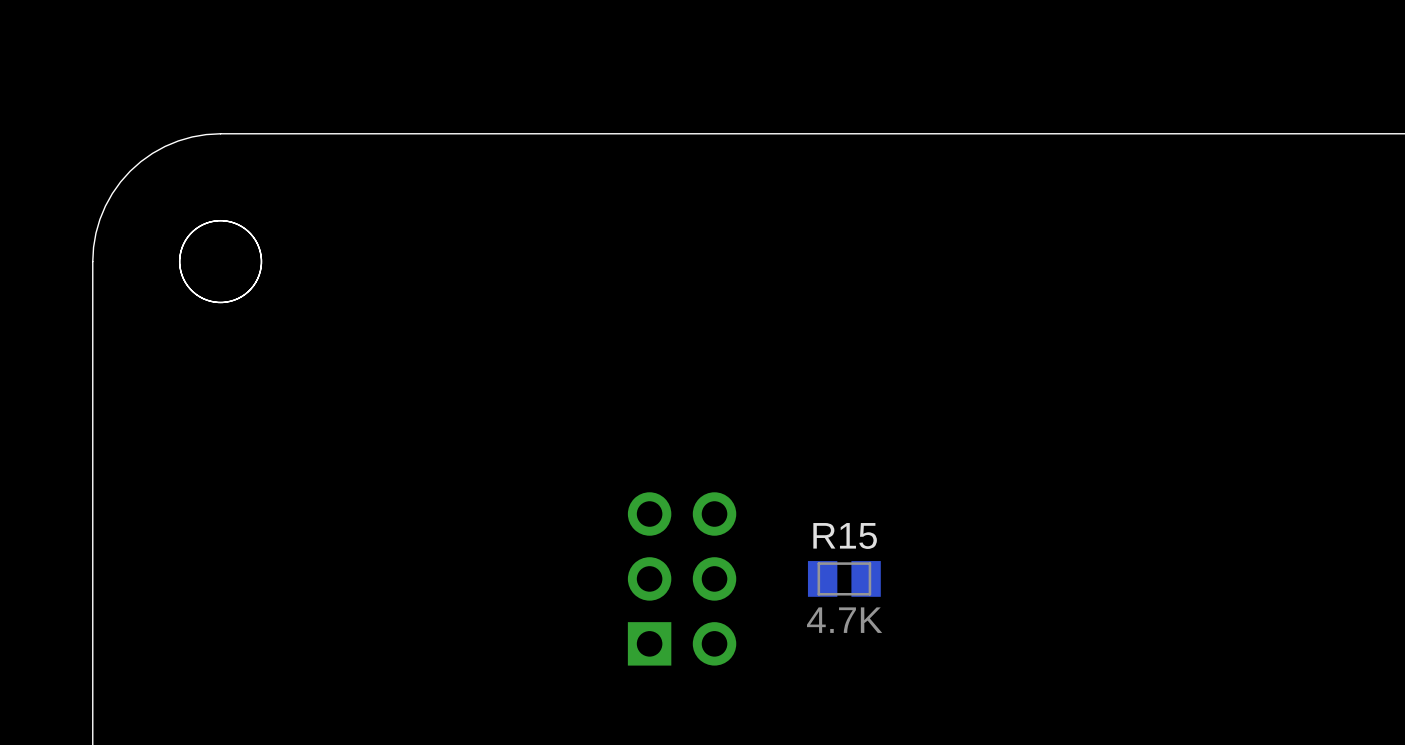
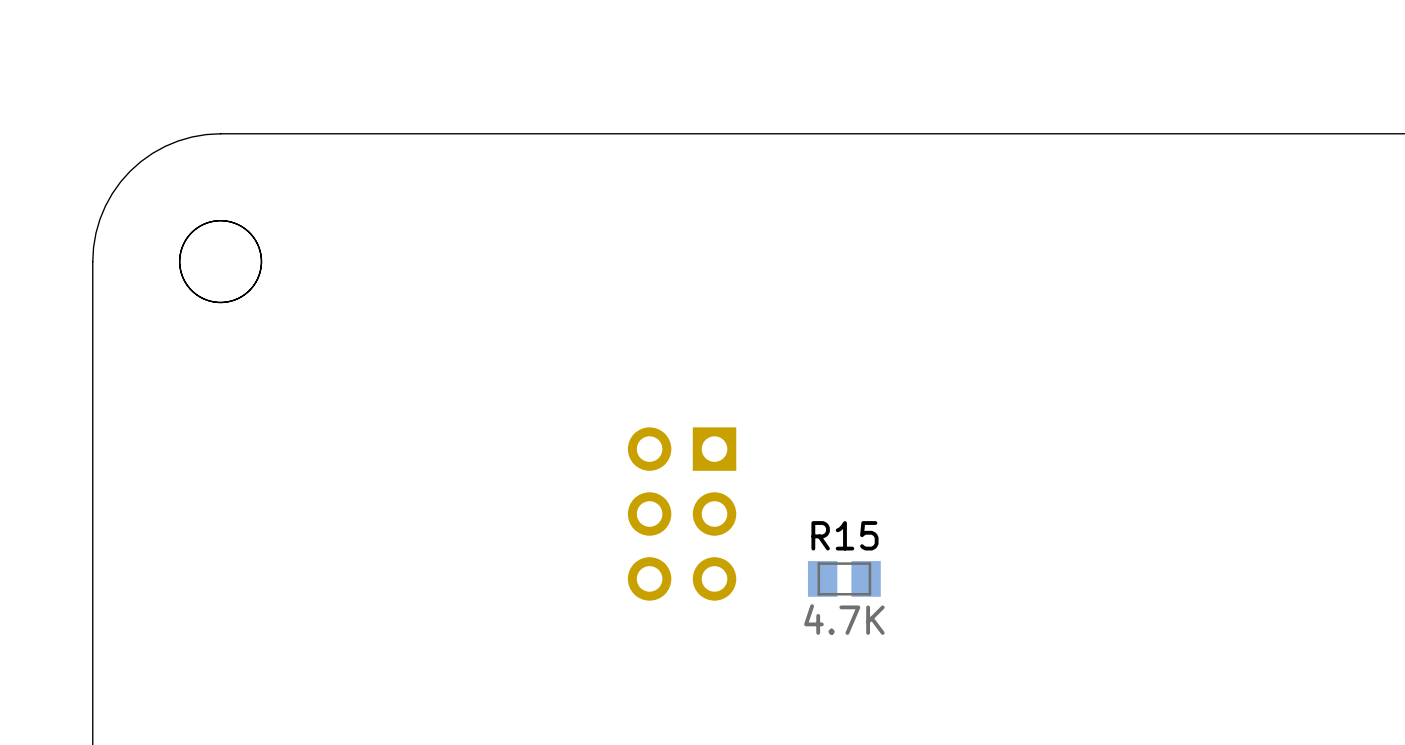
part rotation: 0° (682, 578) -> 180° (682, 514)

